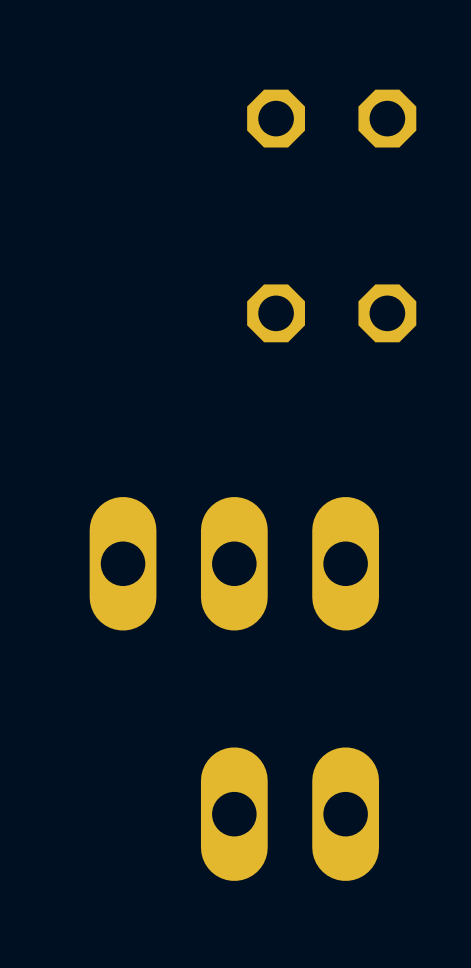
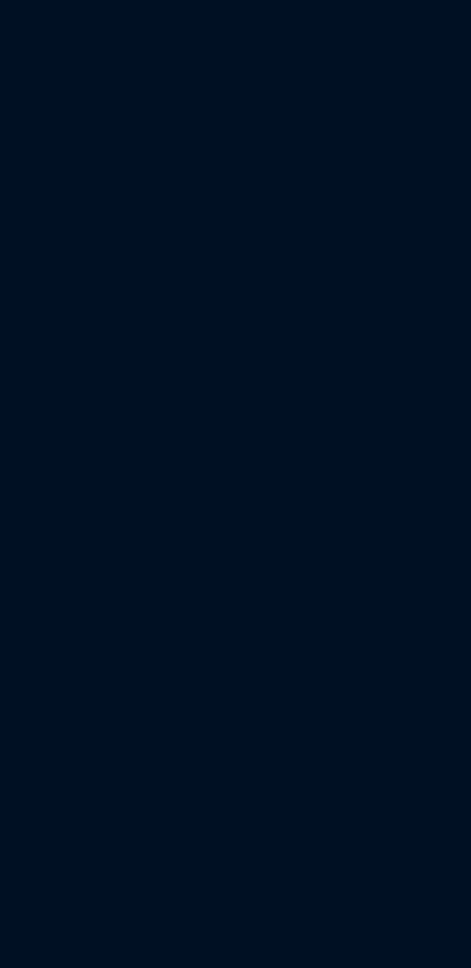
part: (331, 118) -> none
part: (331, 313) -> none
part: (234, 563) -> none
part: (289, 814) -> none

